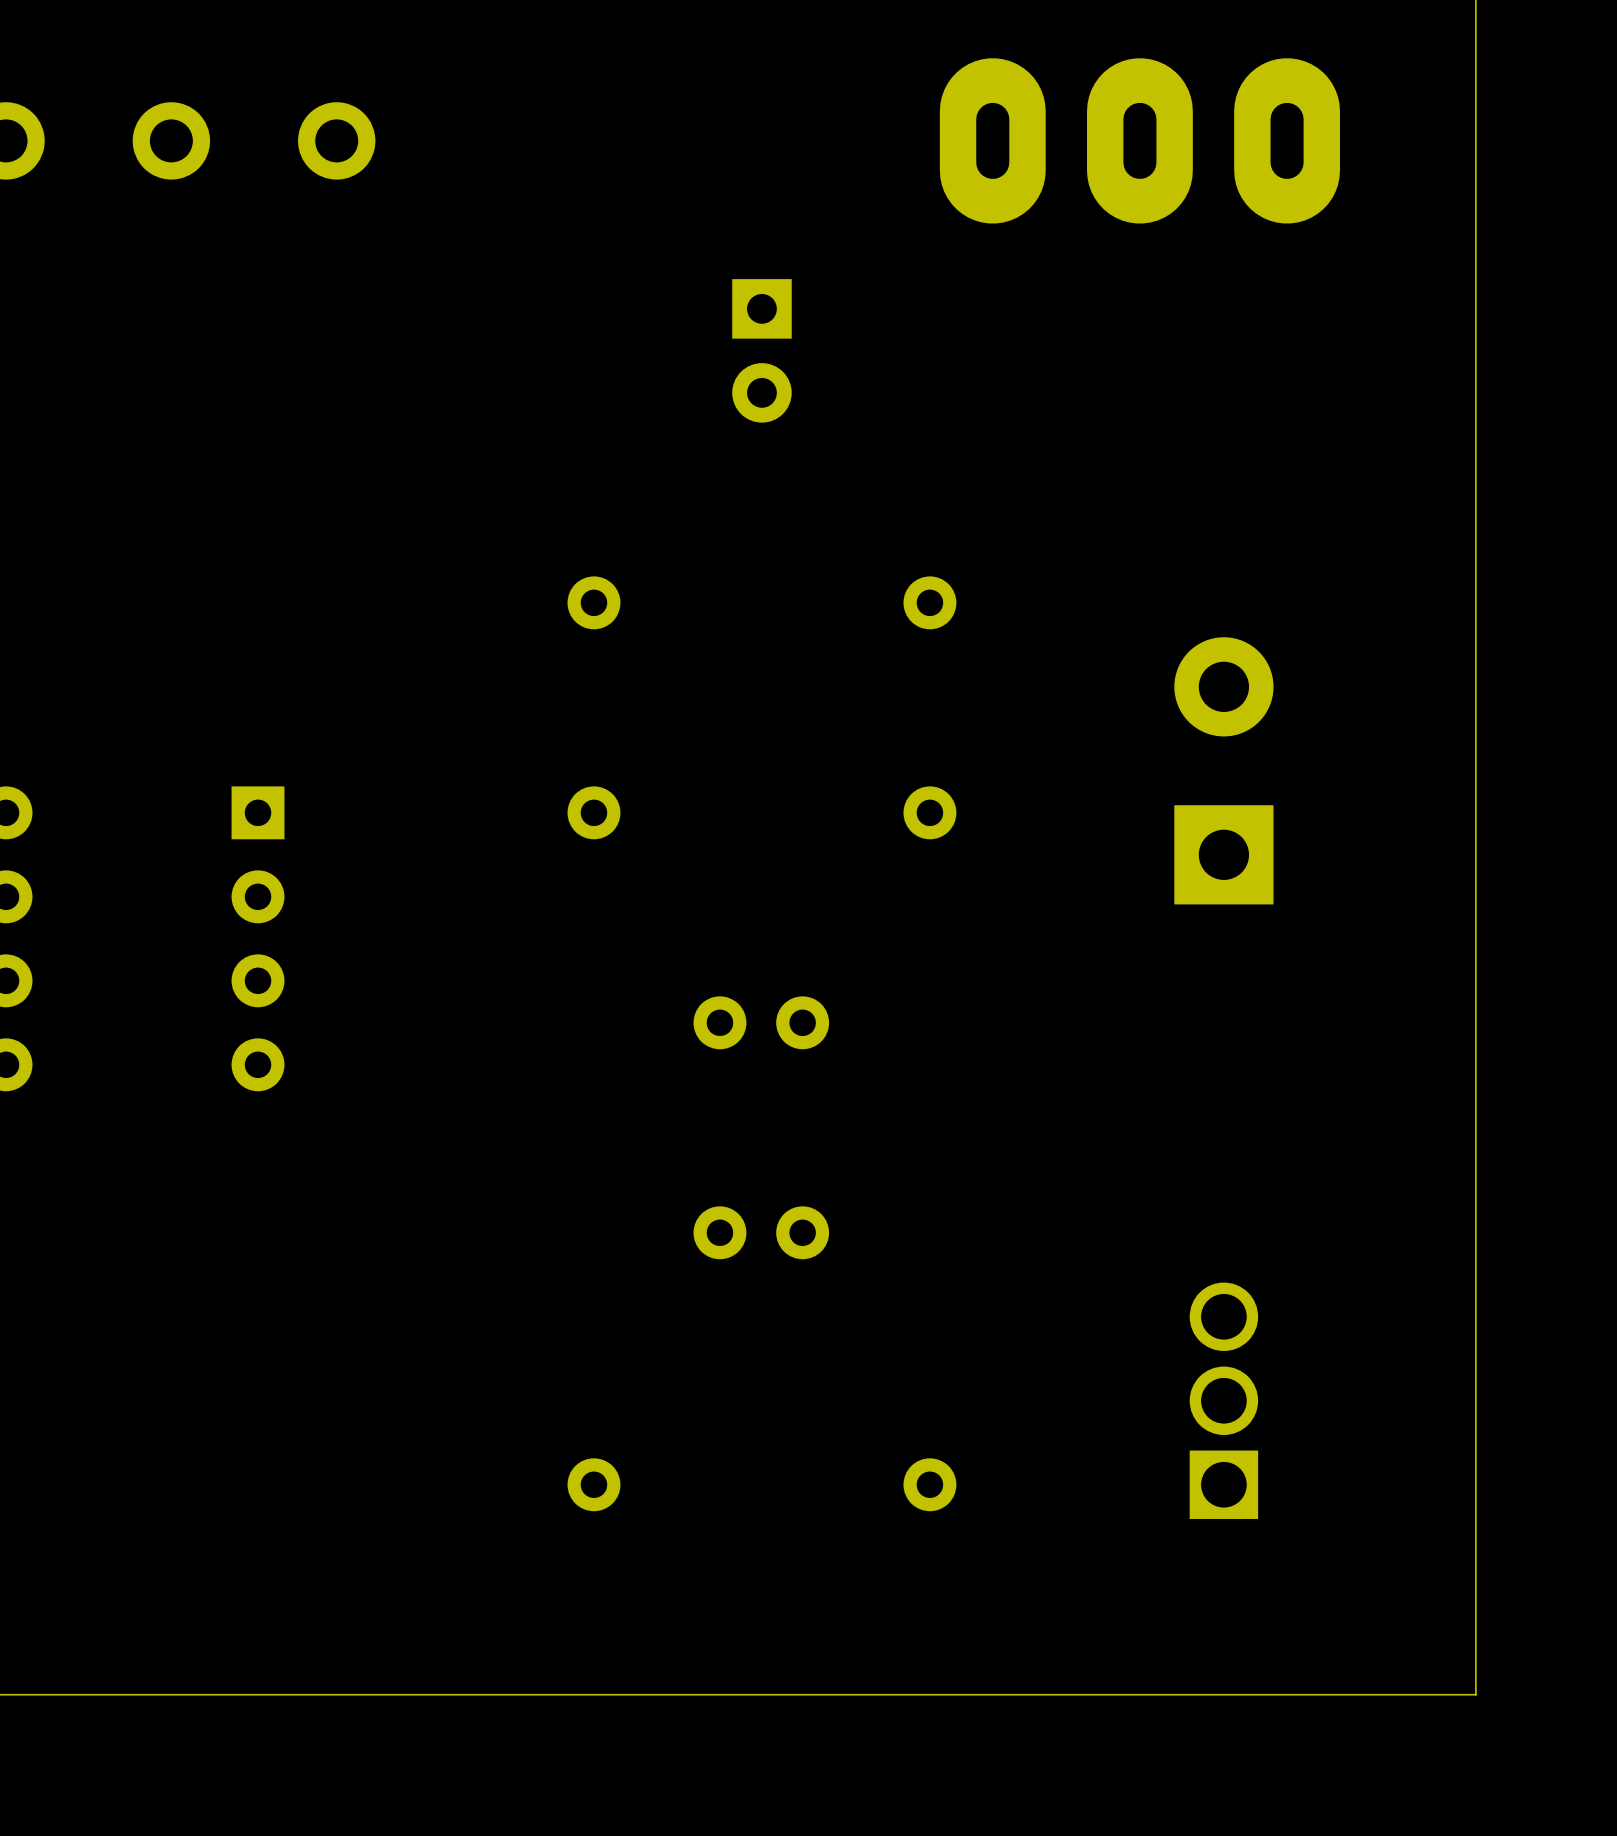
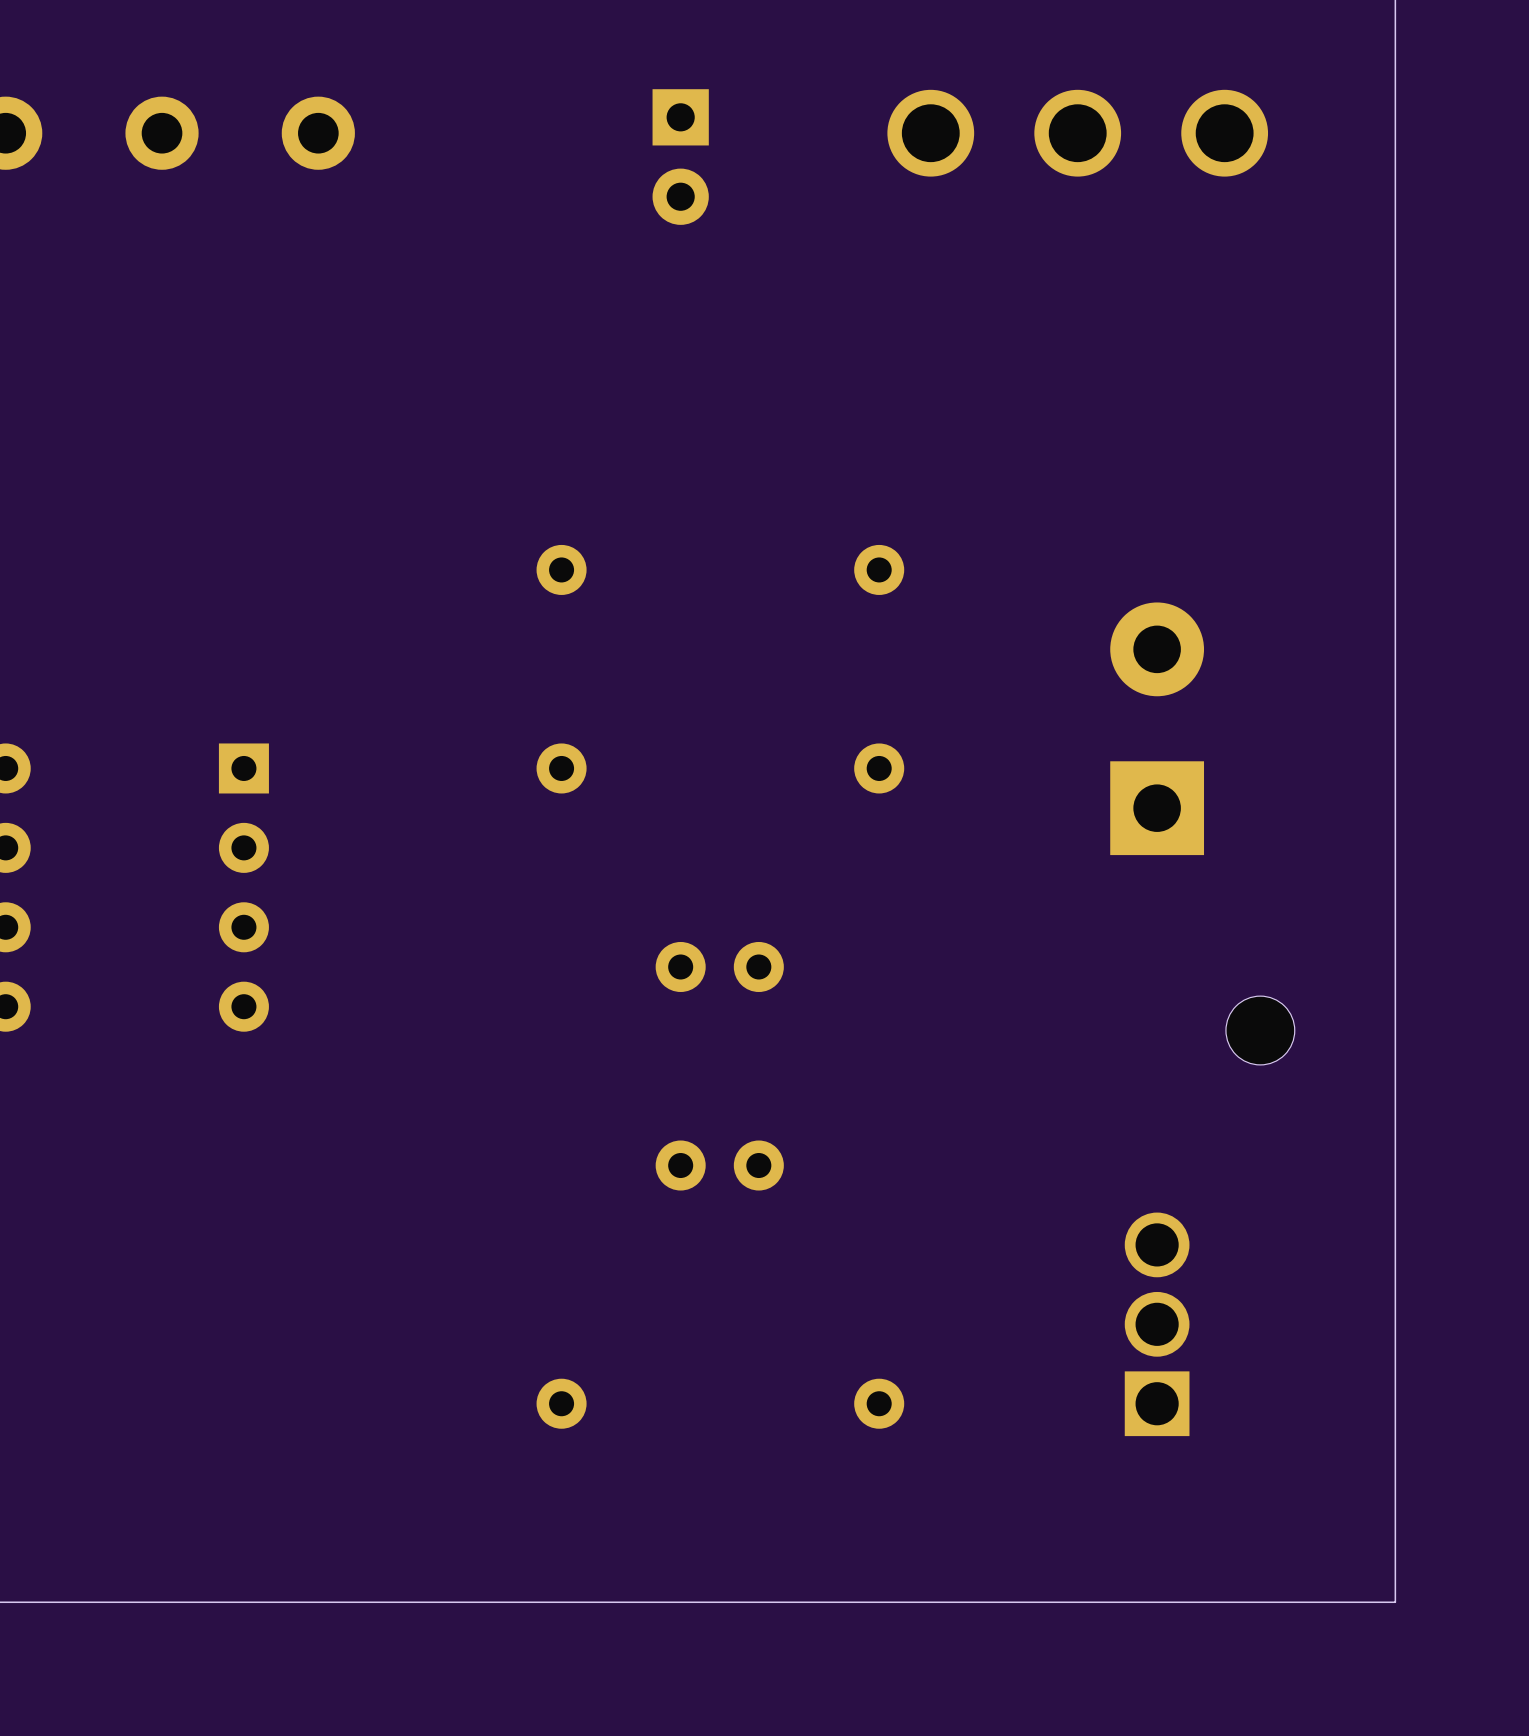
part footprint: [939, 58, 1340, 224] -> [887, 89, 1269, 177]
part position: (761, 350) -> (680, 157)
part: none -> (1260, 1030)

